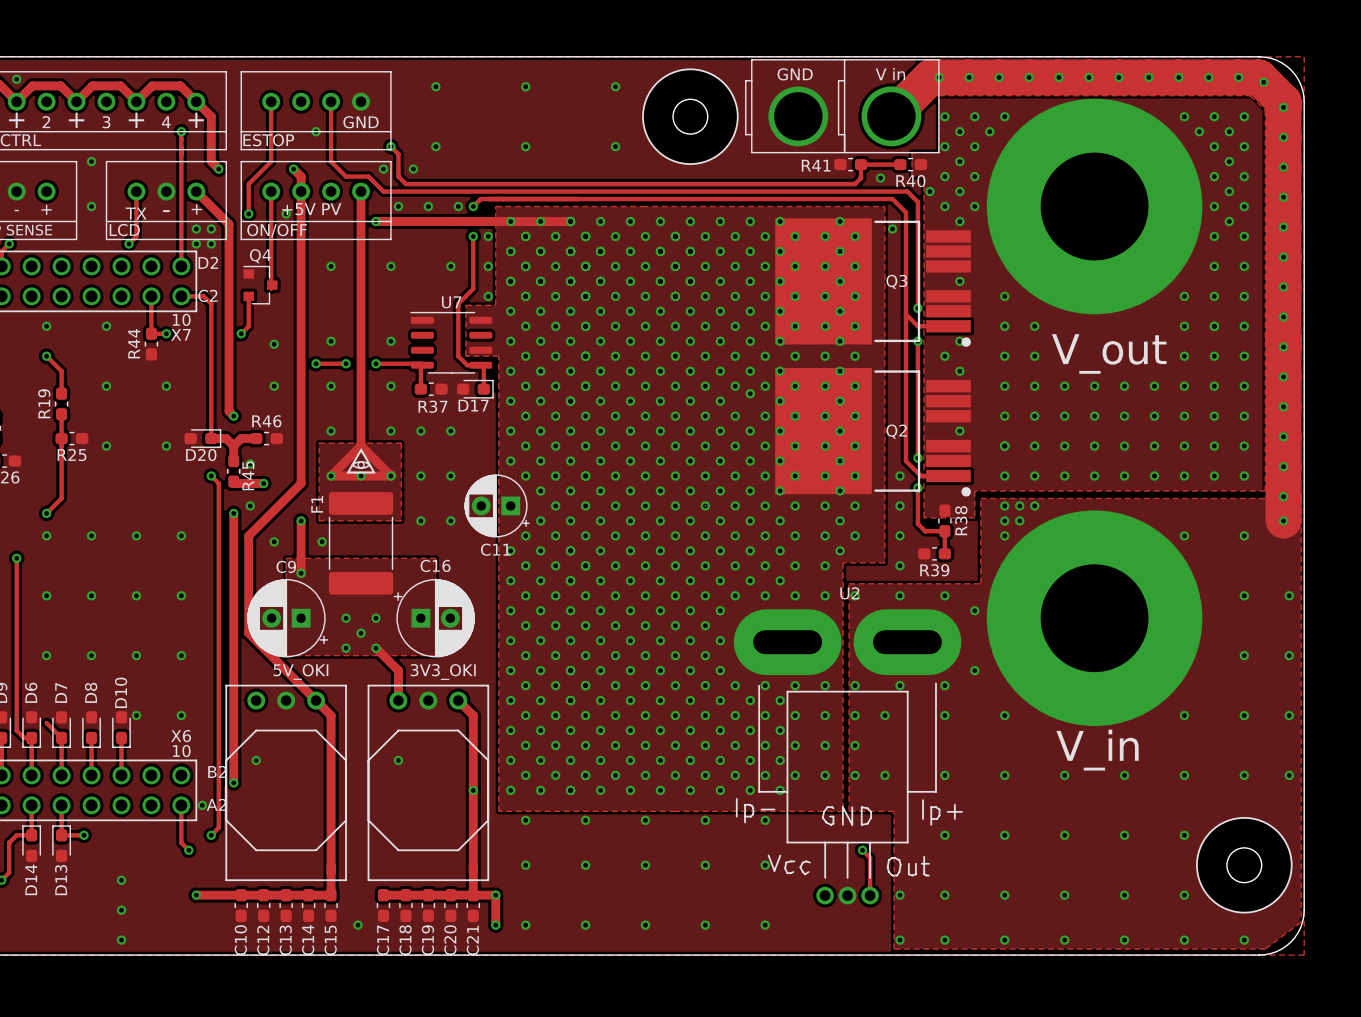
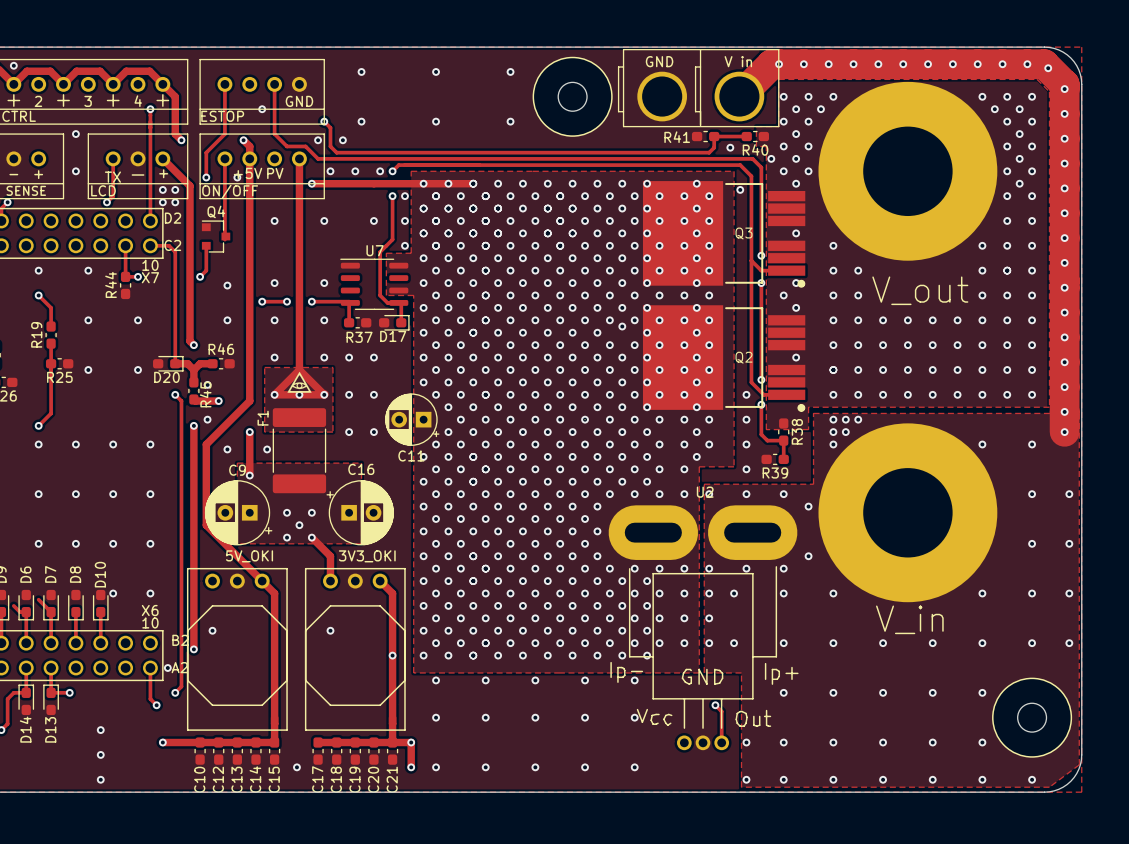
track: (16, 558) (16, 730) -> none
via: (16, 558) -> none

